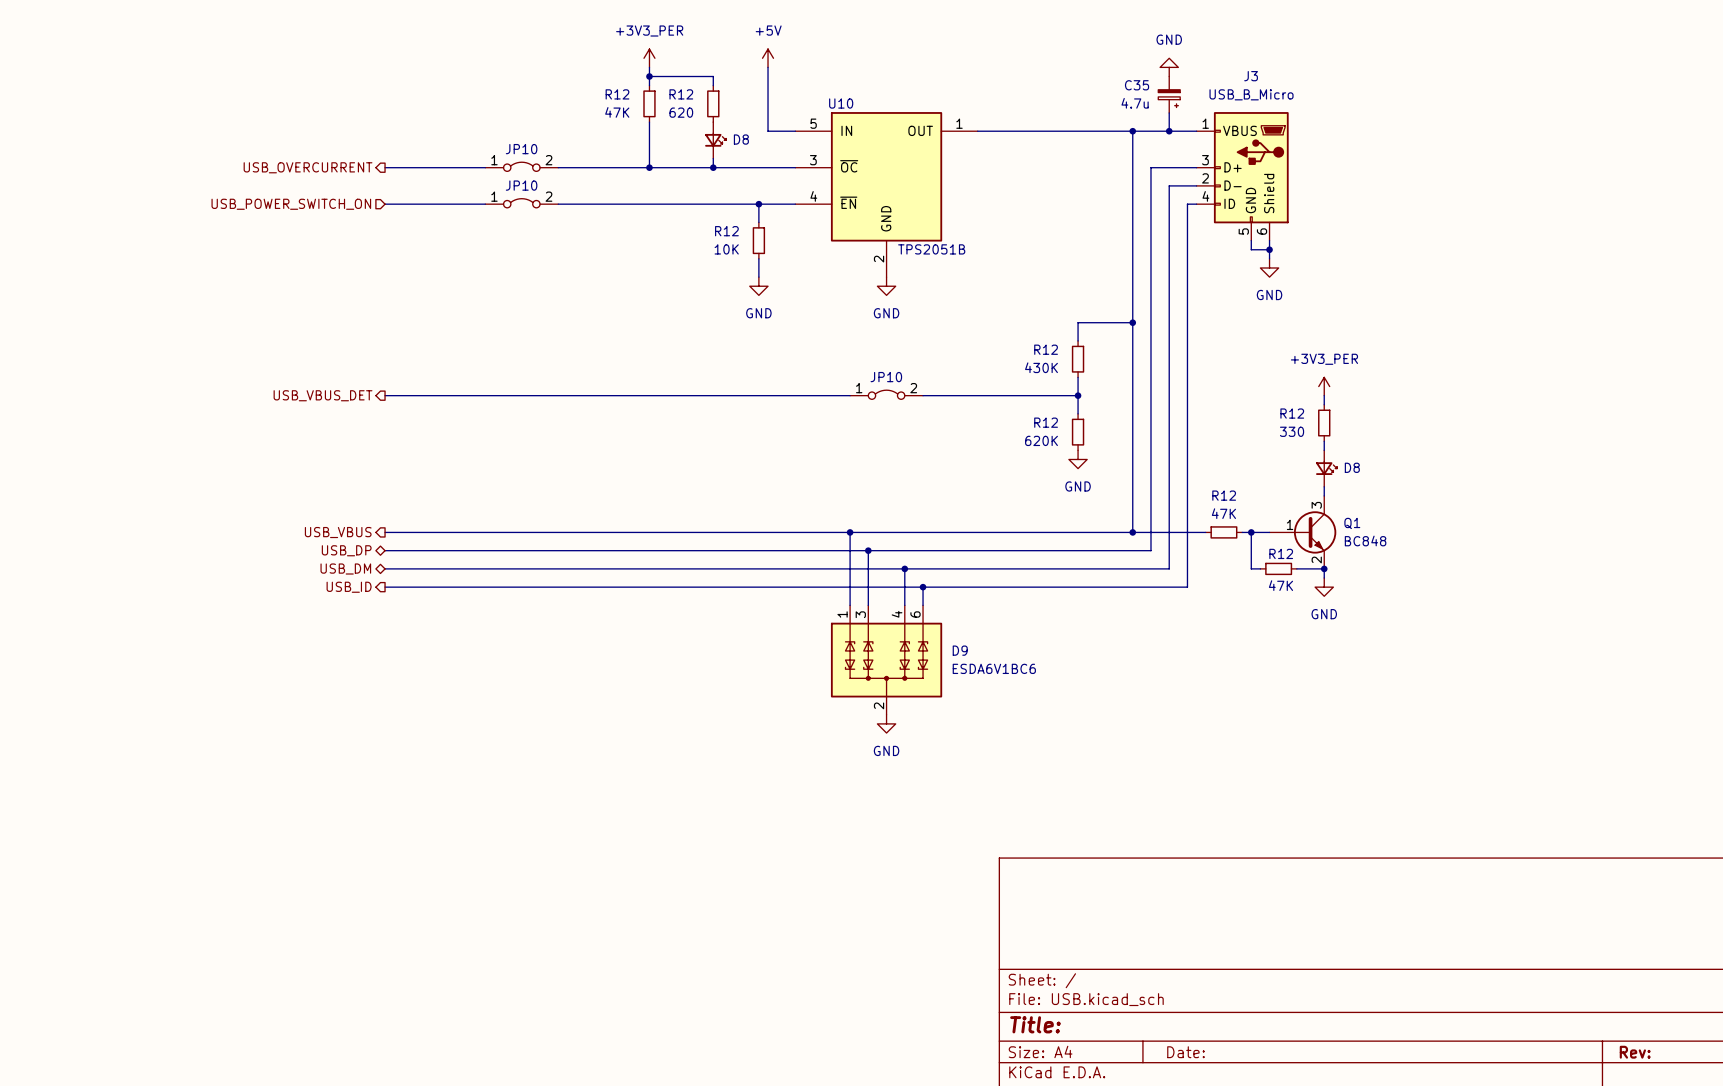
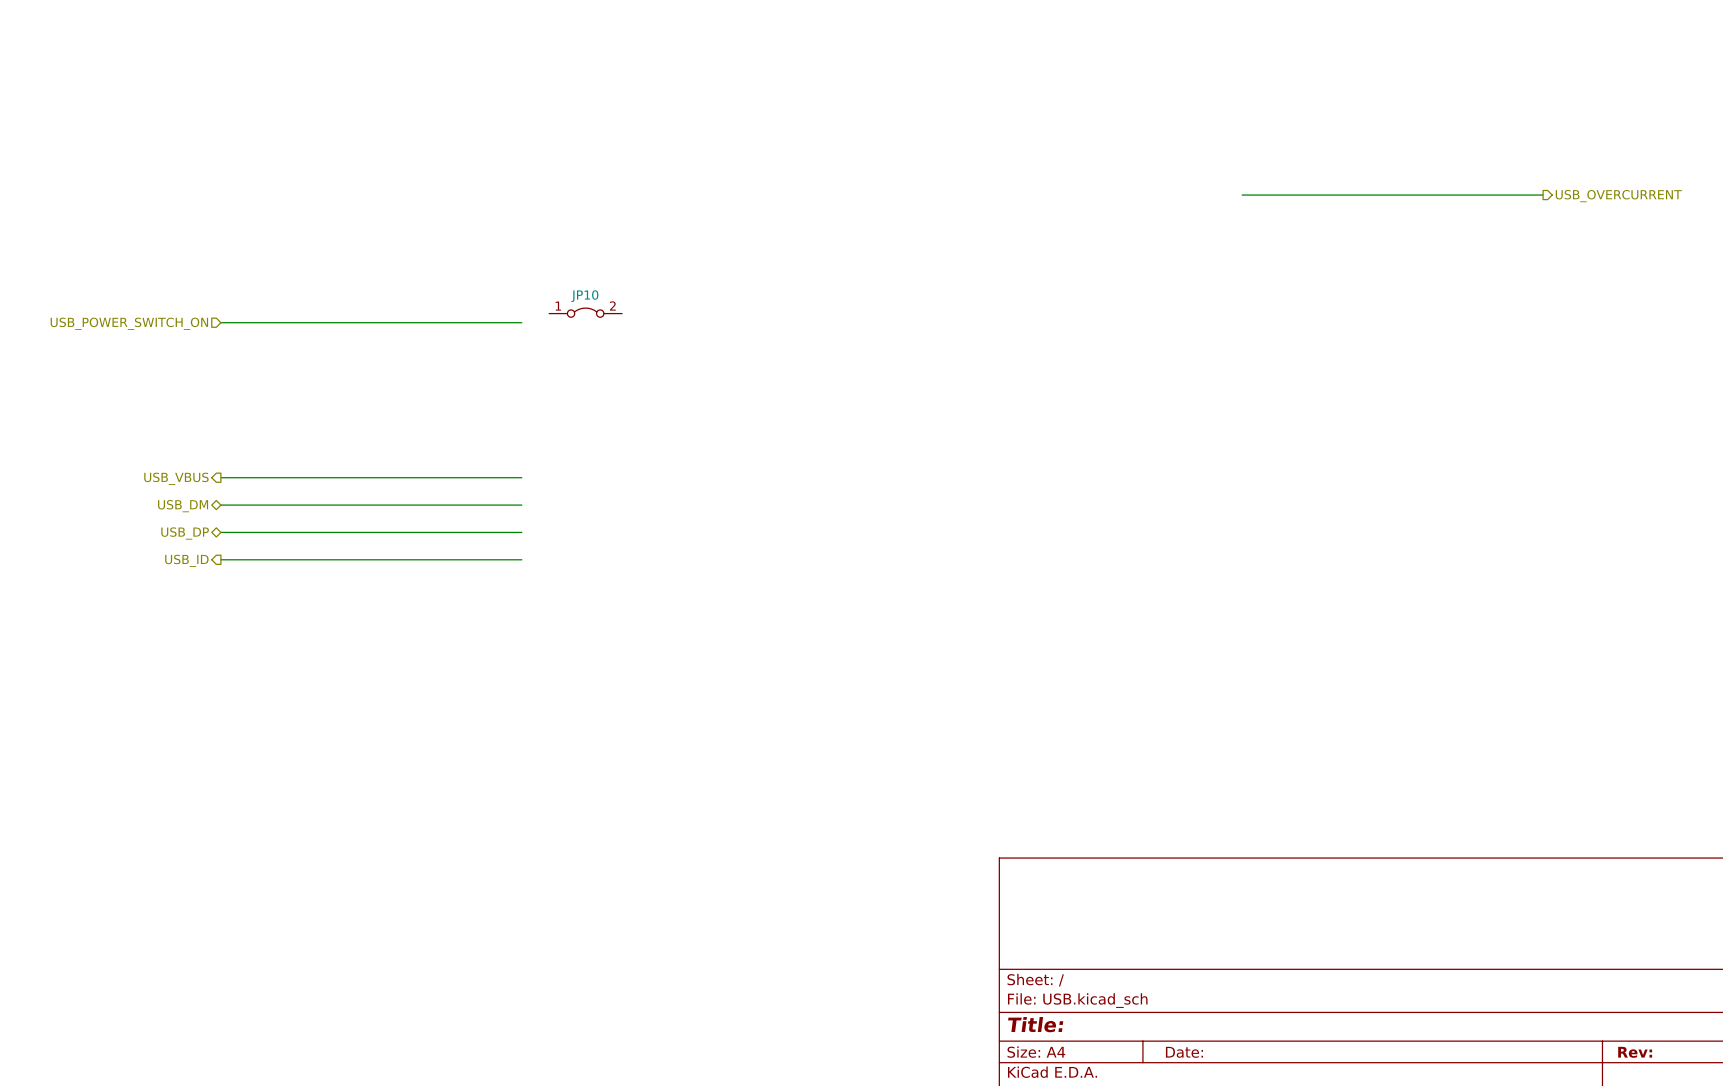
power symbol: +3V3_PER (649, 58) -> none
power symbol: +5V (768, 58) -> none
wire: (649, 67) (649, 85) -> none
wire: (768, 67) (768, 131) (795, 131) -> none
power symbol: GND (1169, 67) -> none
wire: (649, 76) (713, 76) (713, 85) -> none
junction: (649, 76) -> none
C35: 4.7u (1169, 94) -> none
R12: 47K (649, 103) -> none
R12: 620 (713, 103) -> none
wire: (1169, 112) (1169, 131) -> none
wire: (649, 122) (649, 167) -> none
wire: (977, 131) (1196, 131) -> none
wire: (1132, 131) (1132, 532) -> none
junction: (1132, 131) -> none
junction: (1169, 131) -> none
D8: (715, 140) -> none
wire: (713, 158) (713, 167) -> none
JP10: (521, 166) -> none
hierarchical label: USB_OVERCURRENT (308, 167) -> none
wire: (385, 167) (485, 167) -> none
wire: (558, 167) (795, 167) -> none
junction: (649, 167) -> none
junction: (713, 167) -> none
wire: (1196, 167) (1150, 167) (1150, 550) (385, 550) -> none
J3: USB_B_Micro (1242, 176) -> none
wire: (1196, 185) (1169, 185) (1169, 568) (385, 568) -> none
U10: TPS2051B (886, 194) -> none
wire: none -> (1242, 195) (1543, 195)
hierarchical label: none -> USB_OVERCURRENT (1618, 196)
JP10: (521, 203) -> none
hierarchical label: USB_POWER_SWITCH_ON (291, 204) -> none
wire: (385, 204) (485, 204) -> none
wire: (558, 204) (795, 204) -> none
wire: (758, 204) (758, 222) -> none
junction: (758, 204) -> none
wire: (1196, 204) (1187, 204) (1187, 587) (385, 587) -> none
R12: 10K (758, 240) -> none
wire: (1251, 240) (1251, 249) (1269, 249) -> none
wire: (1269, 240) (1269, 258) -> none
junction: (1269, 249) -> none
wire: (758, 258) (758, 277) -> none
power symbol: GND (1269, 267) -> none
power symbol: GND (758, 286) -> none
power symbol: GND (886, 286) -> none
JP10: none -> (585, 312)
hierarchical label: none -> USB_POWER_SWITCH_ON (129, 323)
wire: none -> (220, 322) (521, 322)
wire: (1132, 322) (1078, 322) (1078, 340) -> none
junction: (1132, 322) -> none
R12: 430K (1078, 359) -> none
wire: (1078, 377) (1078, 413) -> none
power symbol: +3V3_PER (1324, 386) -> none
JP10: (886, 394) -> none
hierarchical label: USB_VBUS_DET (323, 395) -> none
wire: (385, 395) (850, 395) -> none
wire: (923, 395) (1078, 395) -> none
junction: (1078, 395) -> none
wire: (1324, 395) (1324, 404) -> none
R12: 330 (1324, 423) -> none
R12: 620K (1078, 432) -> none
wire: (1324, 441) (1324, 450) -> none
power symbol: GND (1078, 459) -> none
D8: (1326, 468) -> none
wire: none -> (220, 477) (521, 477)
wire: (1324, 486) (1324, 495) -> none
wire: none -> (220, 505) (521, 505)
wire: none -> (220, 532) (385, 532)
hierarchical label position: USB_VBUS (338, 532) -> USB_VBUS (176, 478)
wire: (521, 532) (1205, 532) -> none
wire: (850, 532) (850, 605) -> none
junction: (850, 532) -> none
junction: (1132, 532) -> none
R12: 47K (1223, 532) -> none
wire: (1242, 532) (1269, 532) -> none
wire: (1251, 532) (1251, 568) (1260, 568) -> none
junction: (1251, 532) -> none
Q1: BC848 (1302, 532) -> none
hierarchical label position: USB_DP (346, 550) -> USB_DP (185, 533)
wire: (868, 550) (868, 605) -> none
junction: (868, 550) -> none
wire: none -> (220, 559) (521, 559)
wire: (904, 568) (904, 605) -> none
junction: (904, 568) -> none
R12: 47K (1278, 568) -> none
wire: (1296, 568) (1324, 568) (1324, 578) -> none
junction: (1324, 568) -> none
hierarchical label position: USB_DM (345, 569) -> USB_DM (183, 506)
hierarchical label position: USB_ID (349, 587) -> USB_ID (186, 560)
wire: (923, 587) (923, 605) -> none
junction: (923, 587) -> none
power symbol: GND (1324, 587) -> none
D9: ESDA6V1BC6 (886, 660) -> none
power symbol: GND (886, 723) -> none

